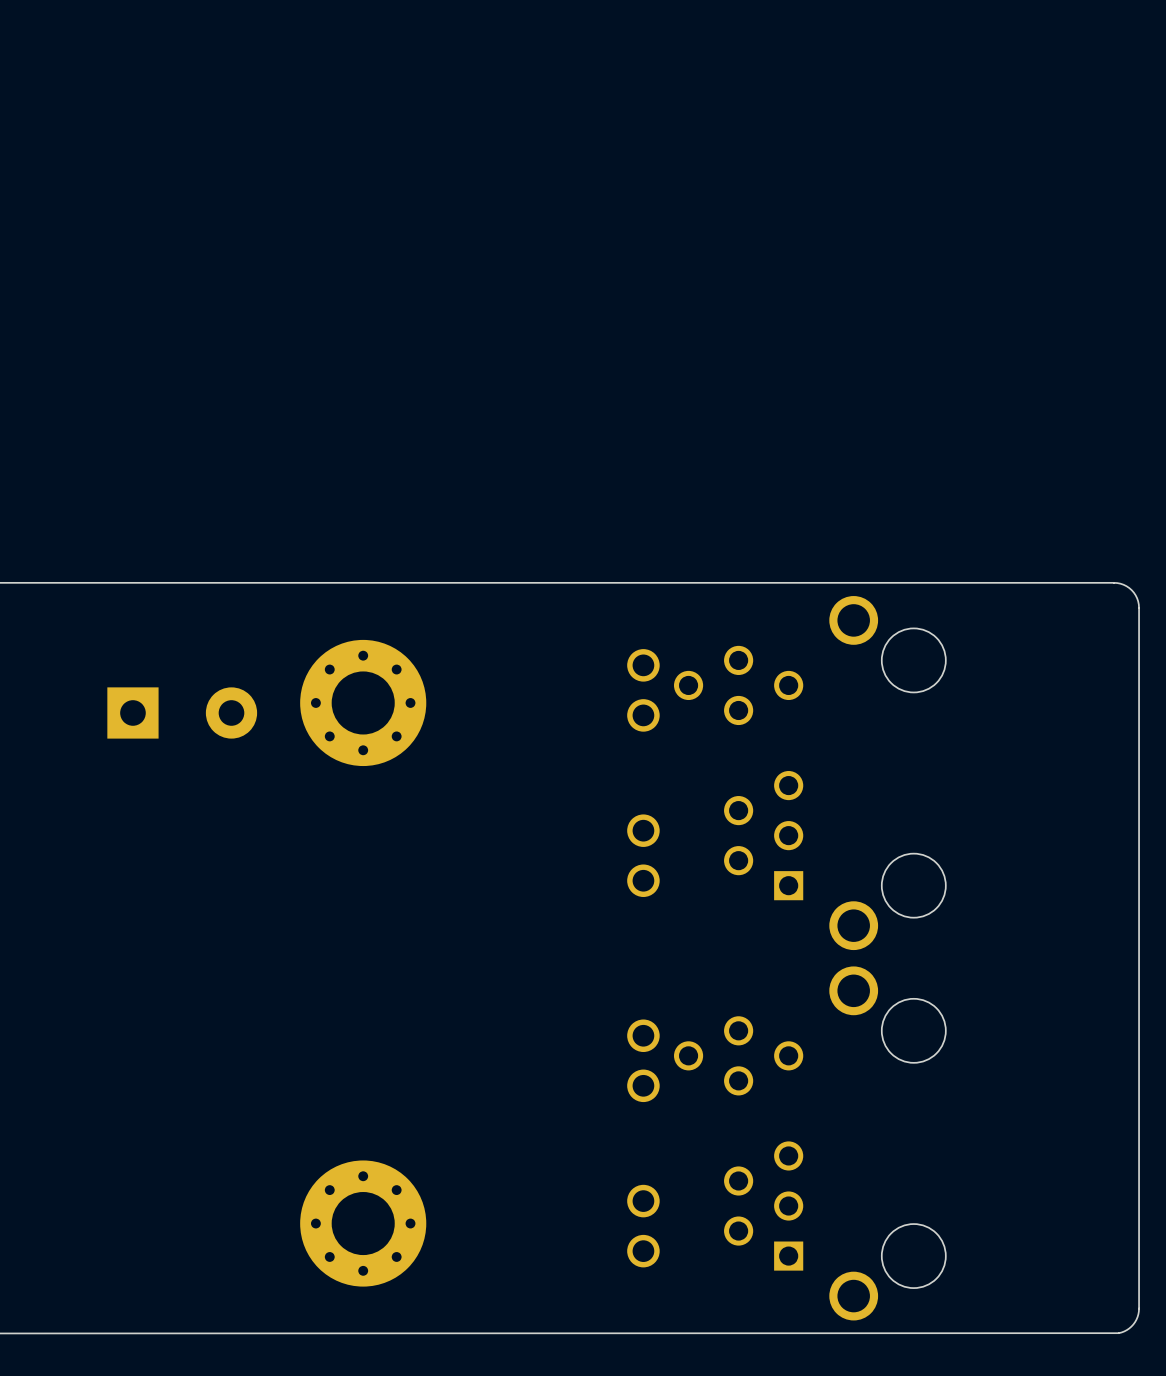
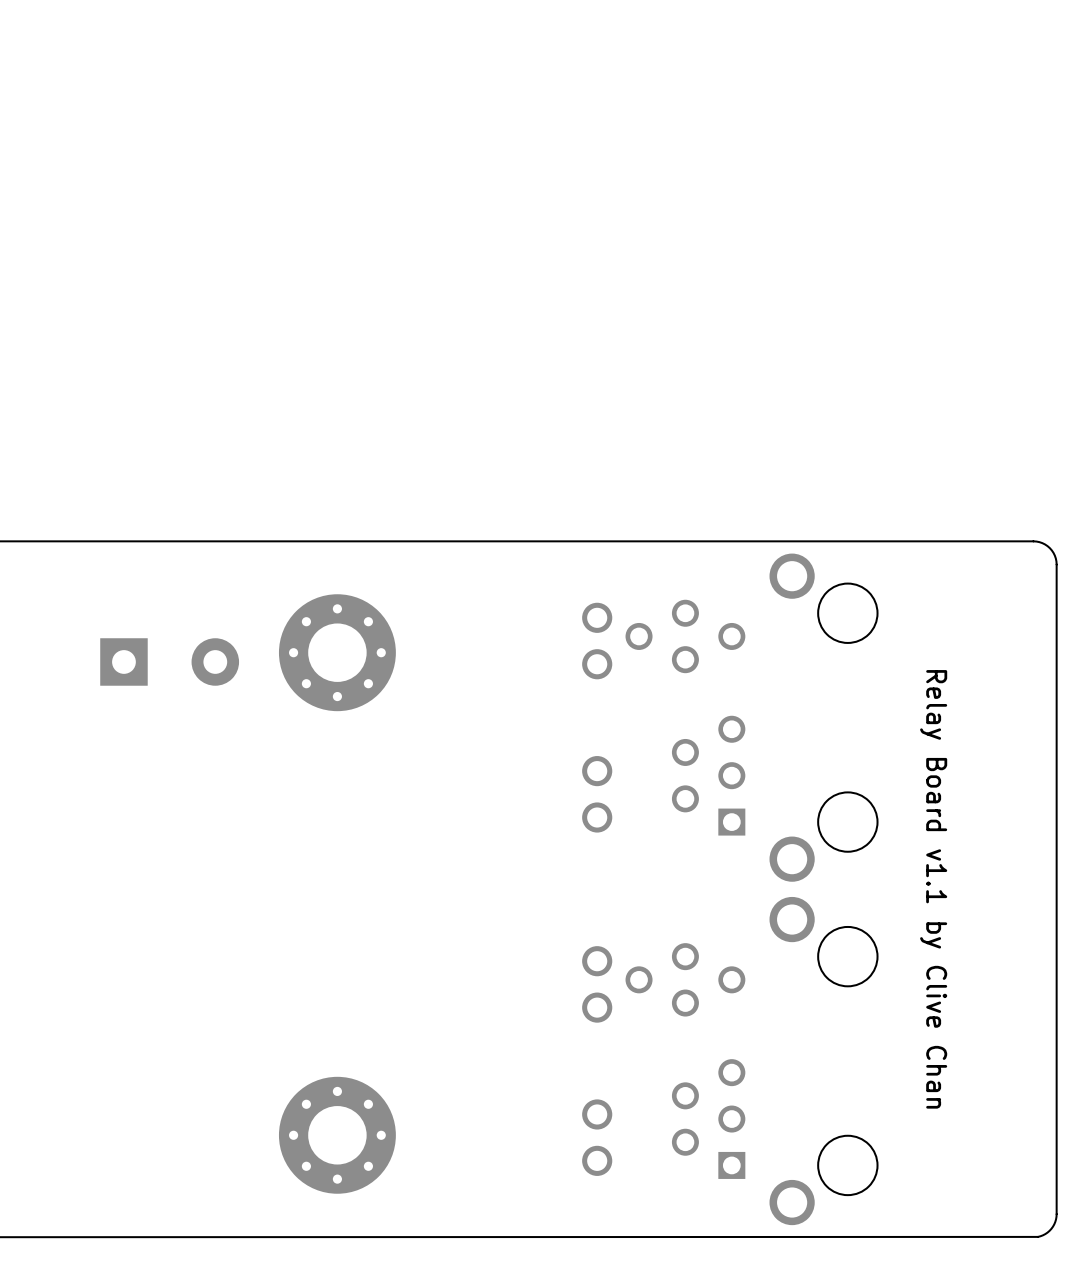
text: none -> Relay Board v1.1 by Clive Chan (933, 889)

